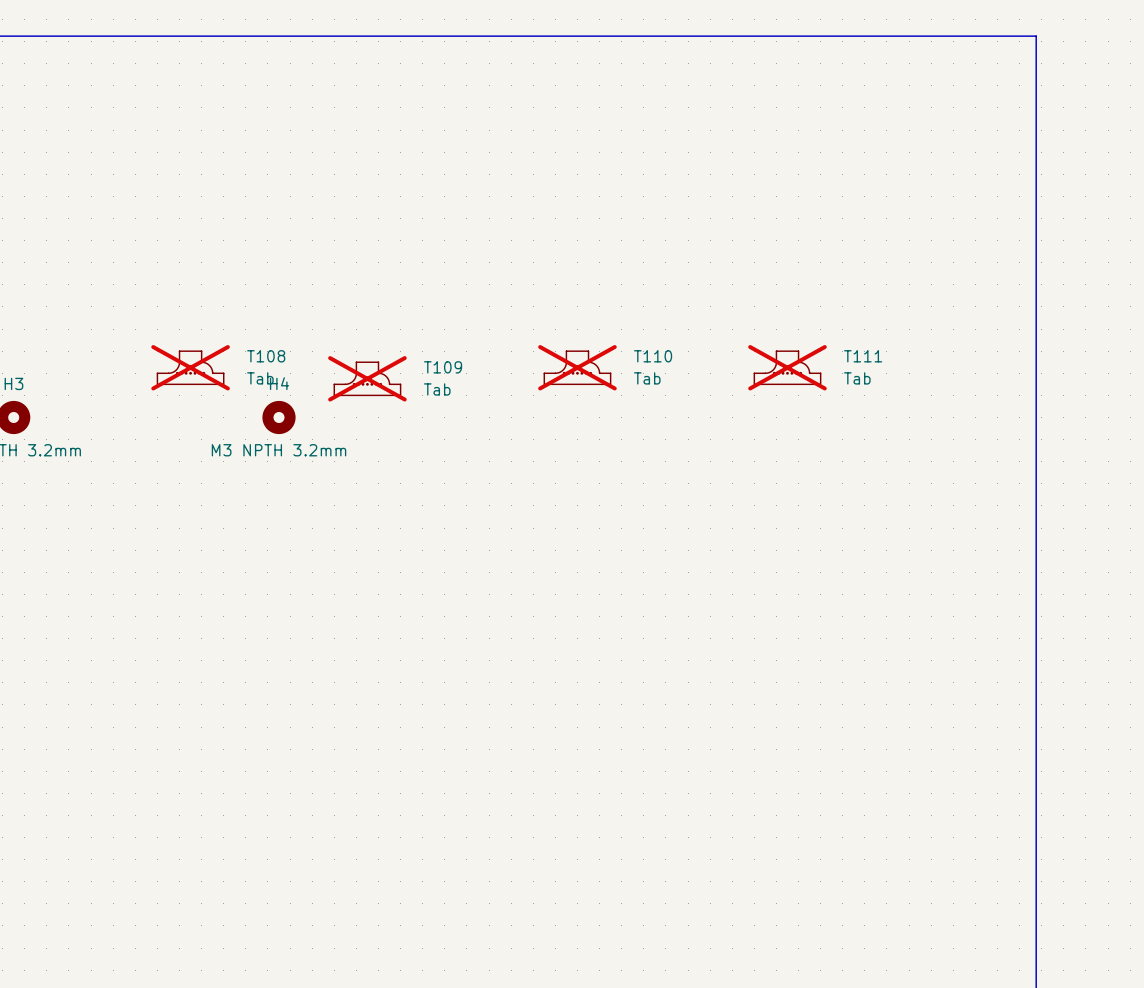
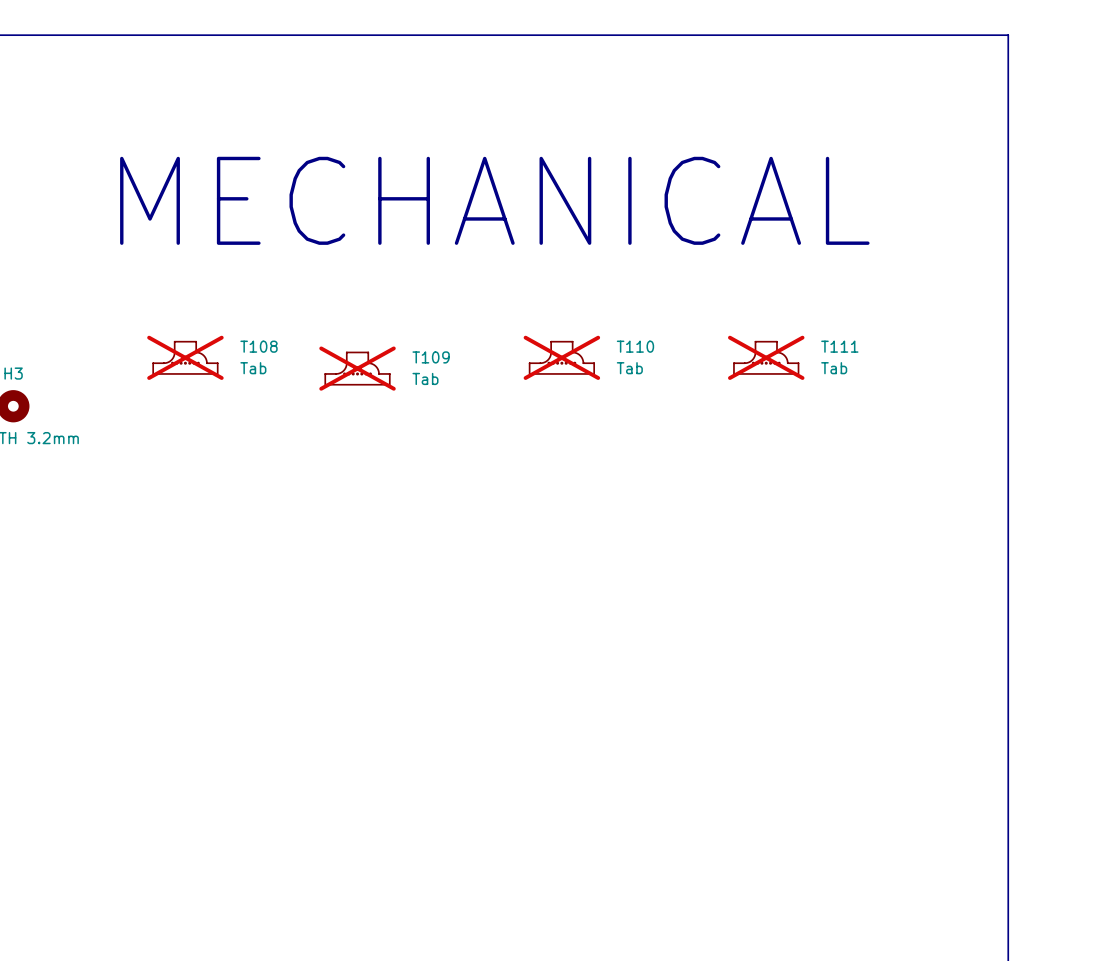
text: none -> MECHANICAL (494, 200)
H4: M3 NPTH 3.2mm (279, 417) -> none

